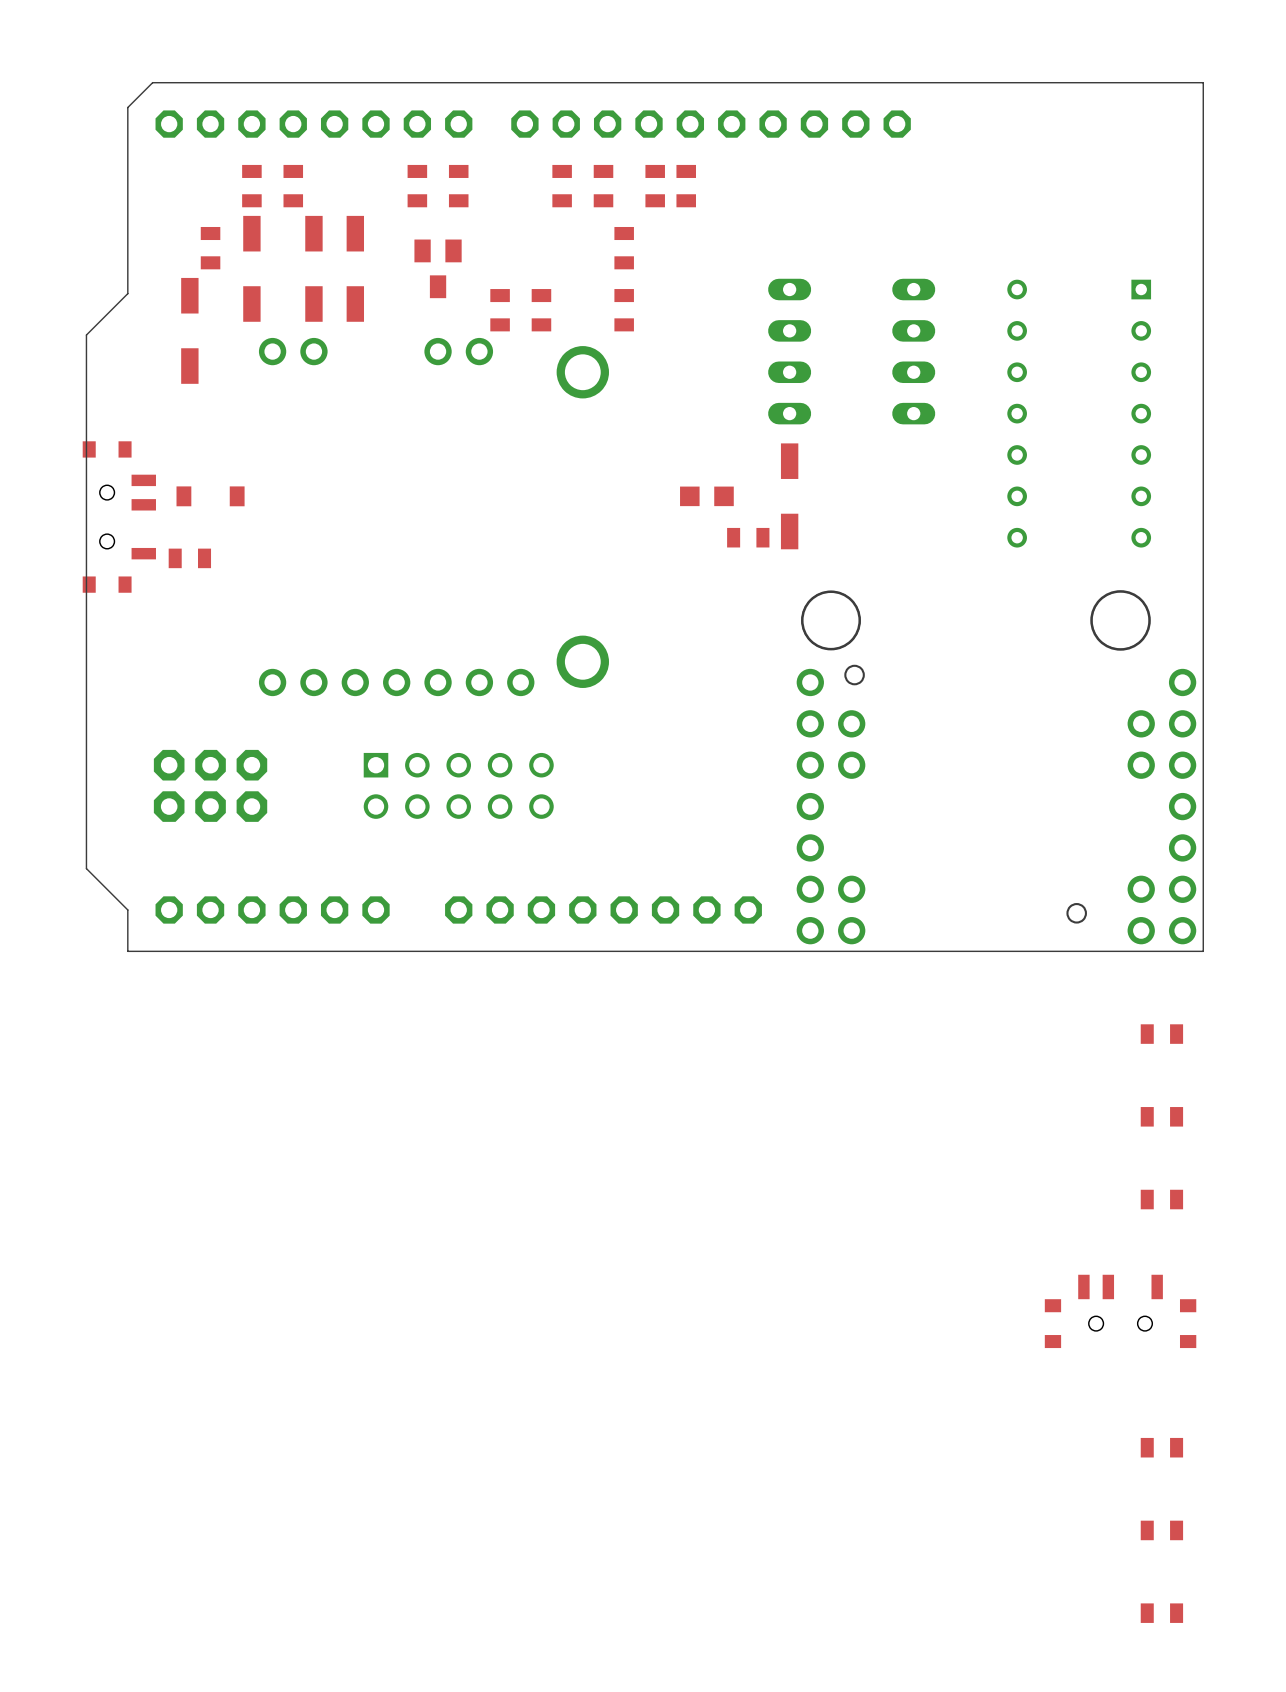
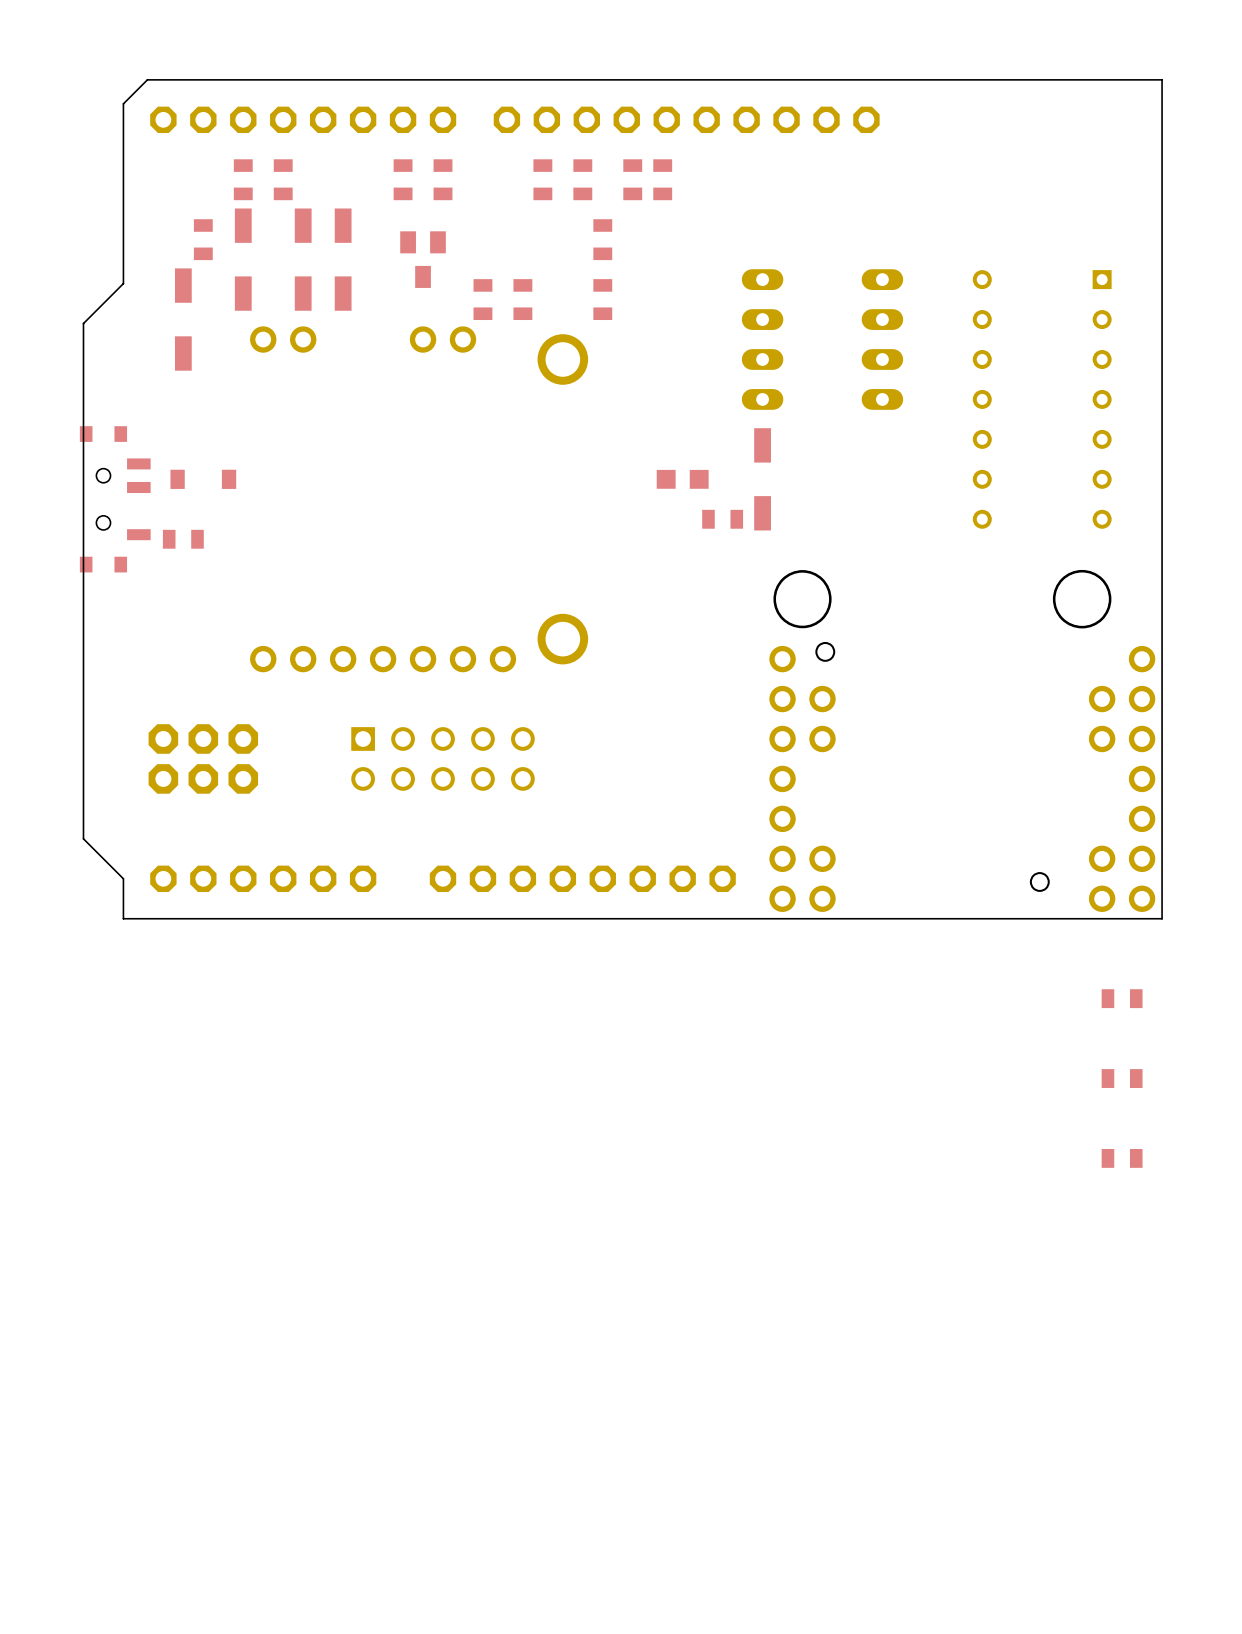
part: (1120, 1311) -> none
part: (1161, 1447) -> none
part: (1161, 1530) -> none
part: (1161, 1613) -> none

